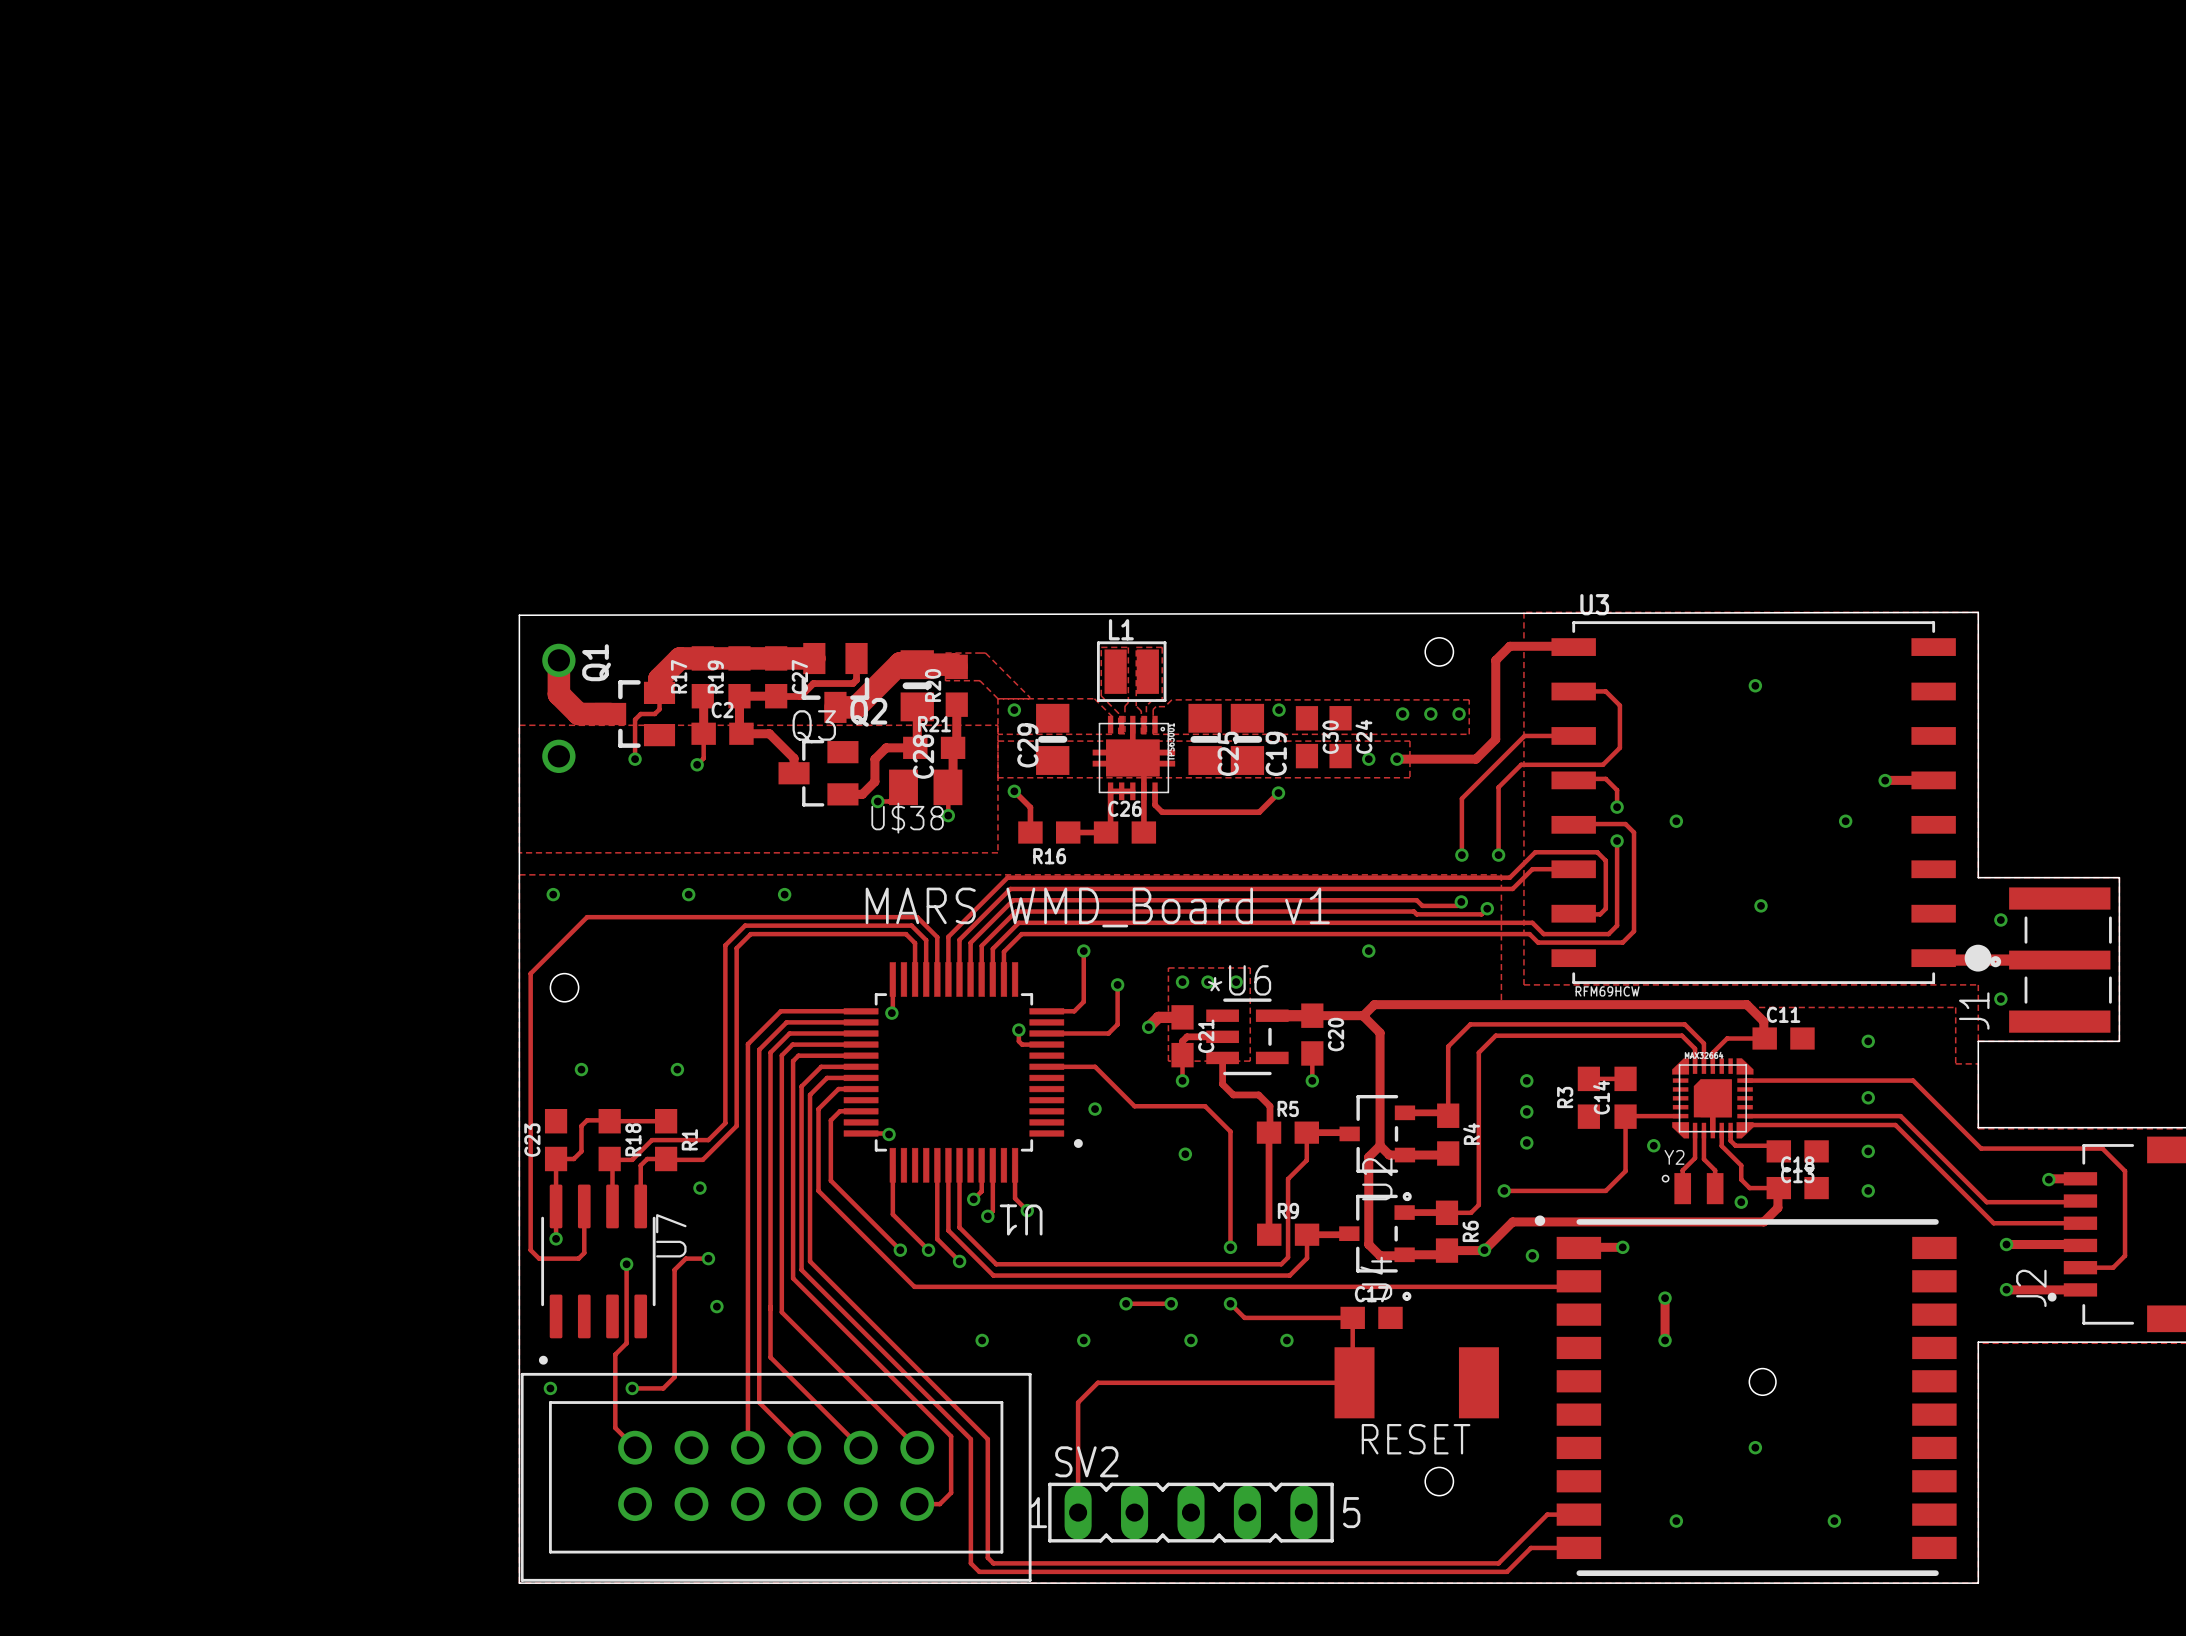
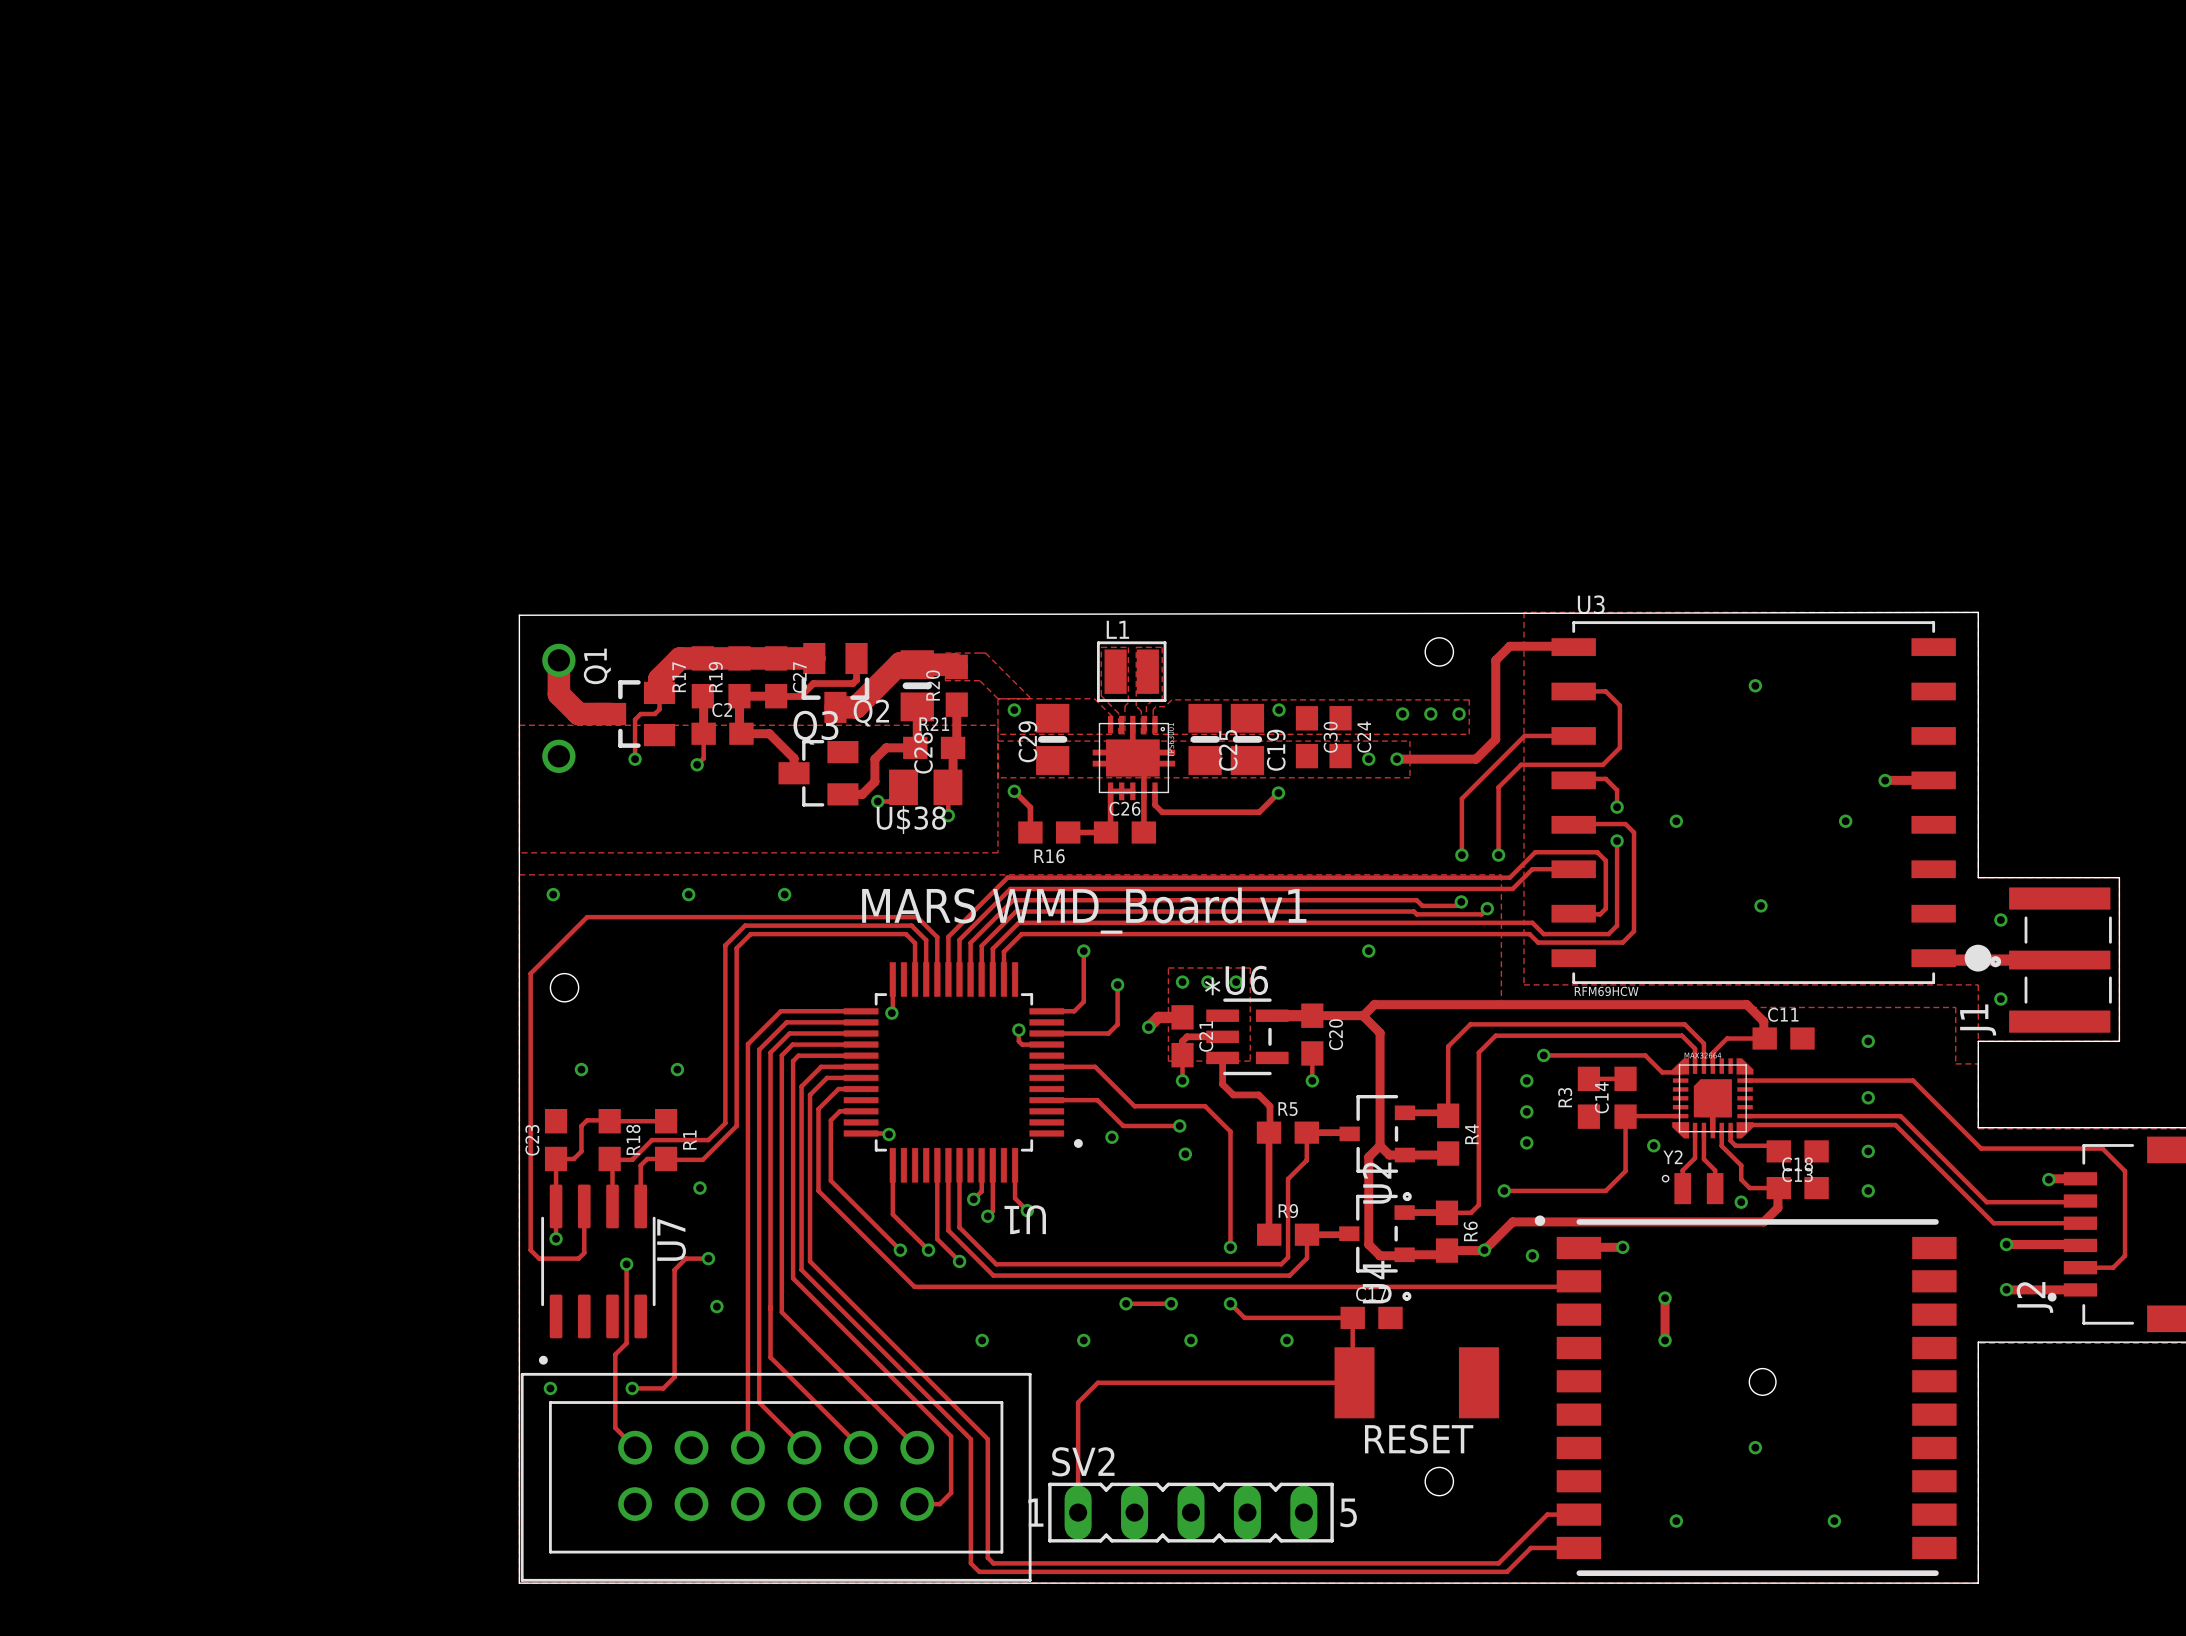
track: none -> (1543, 1055) (1645, 1055) (1662, 1072) (1680, 1071)
via: none -> (1543, 1055)
track: none -> (1046, 1100) (1097, 1100) (1123, 1125) (1179, 1125)
via position: (1095, 1109) -> (1111, 1137)
via: none -> (1179, 1125)

